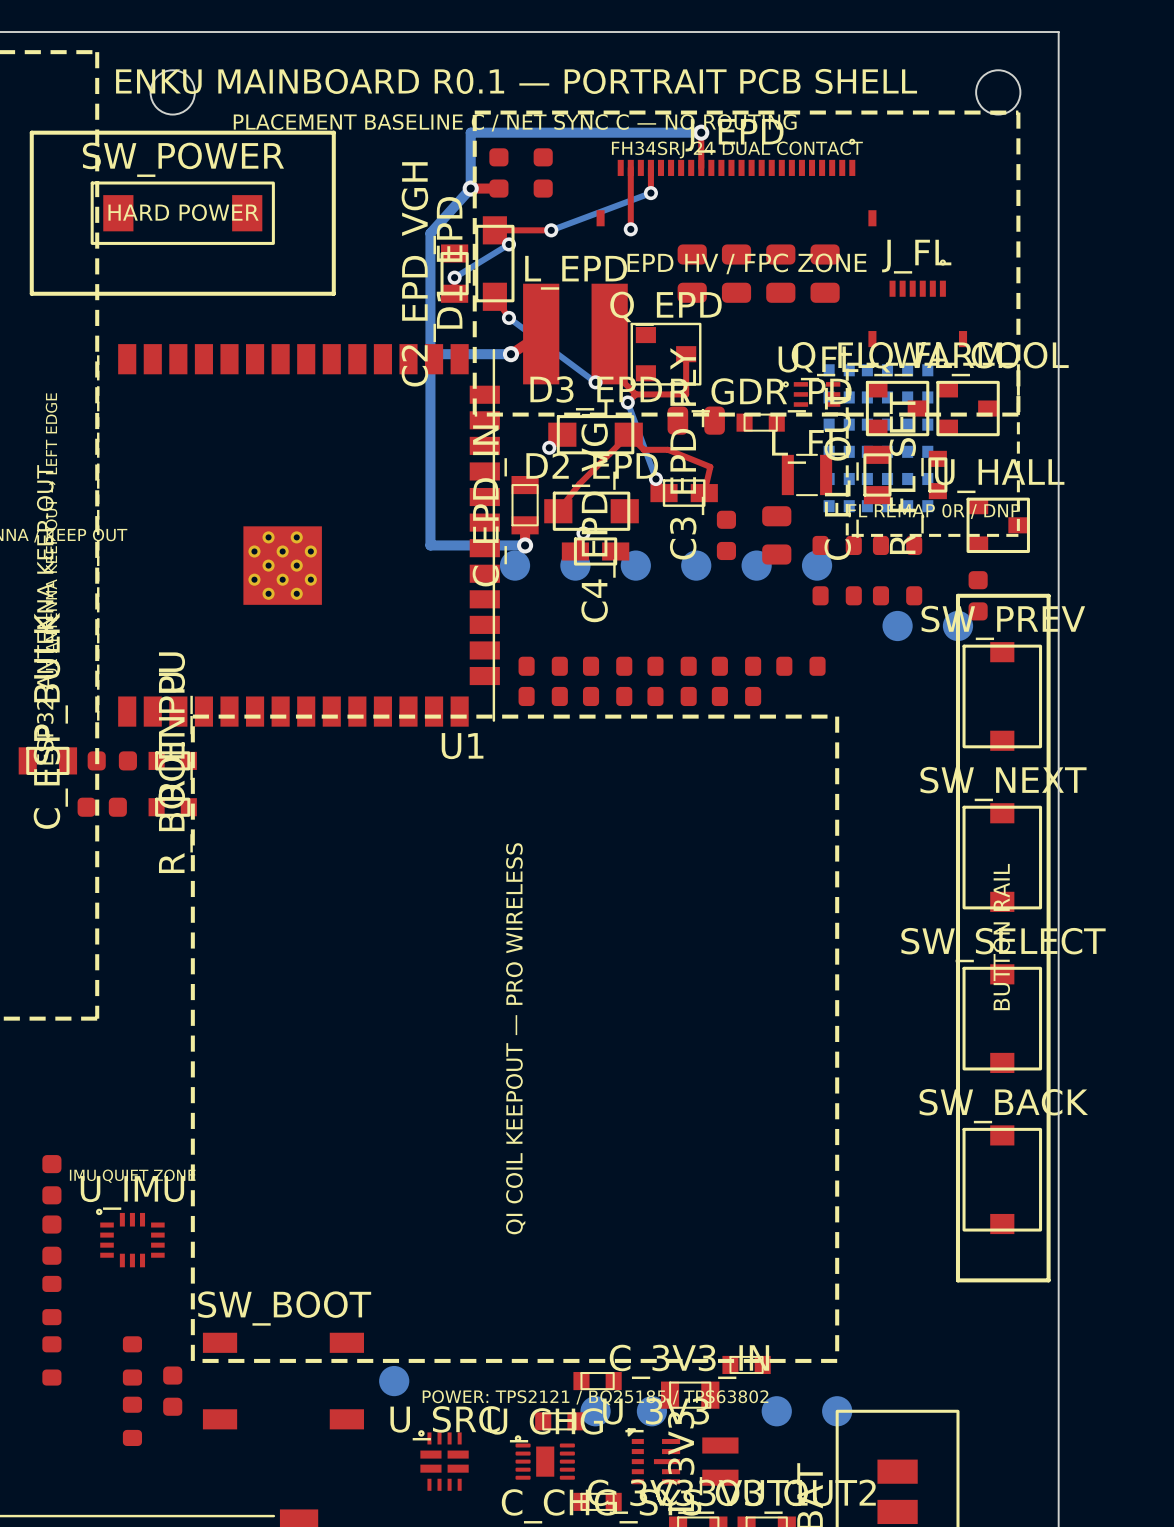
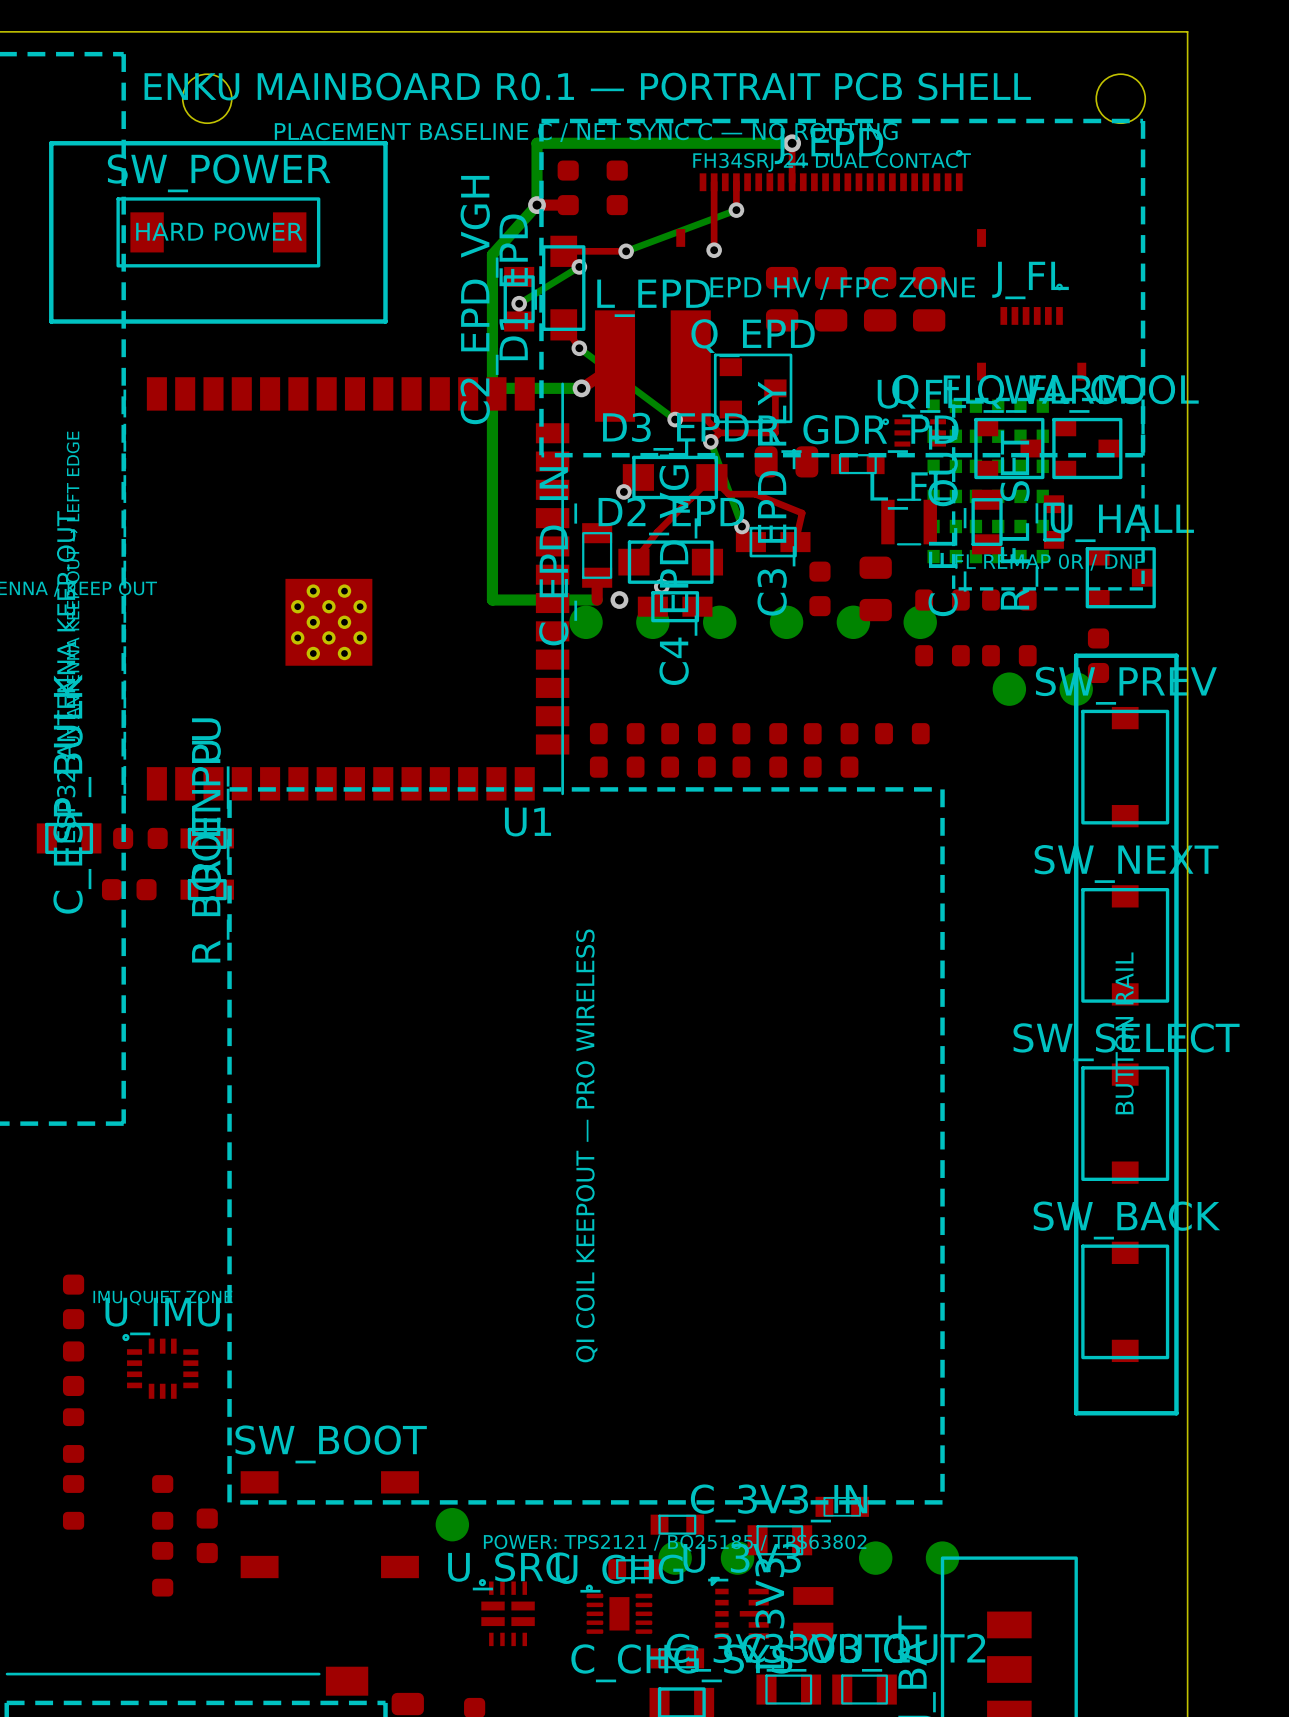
via position: (525, 545) -> (619, 600)

